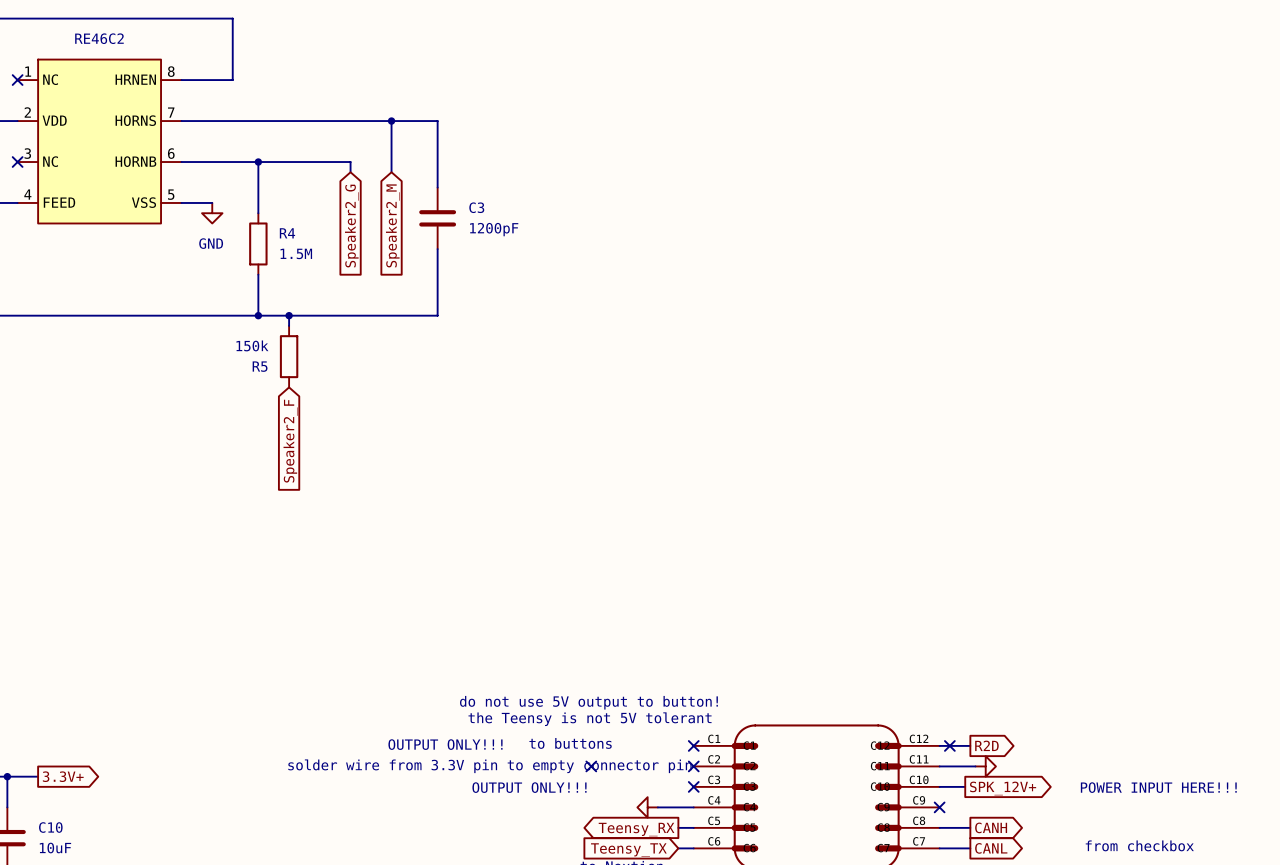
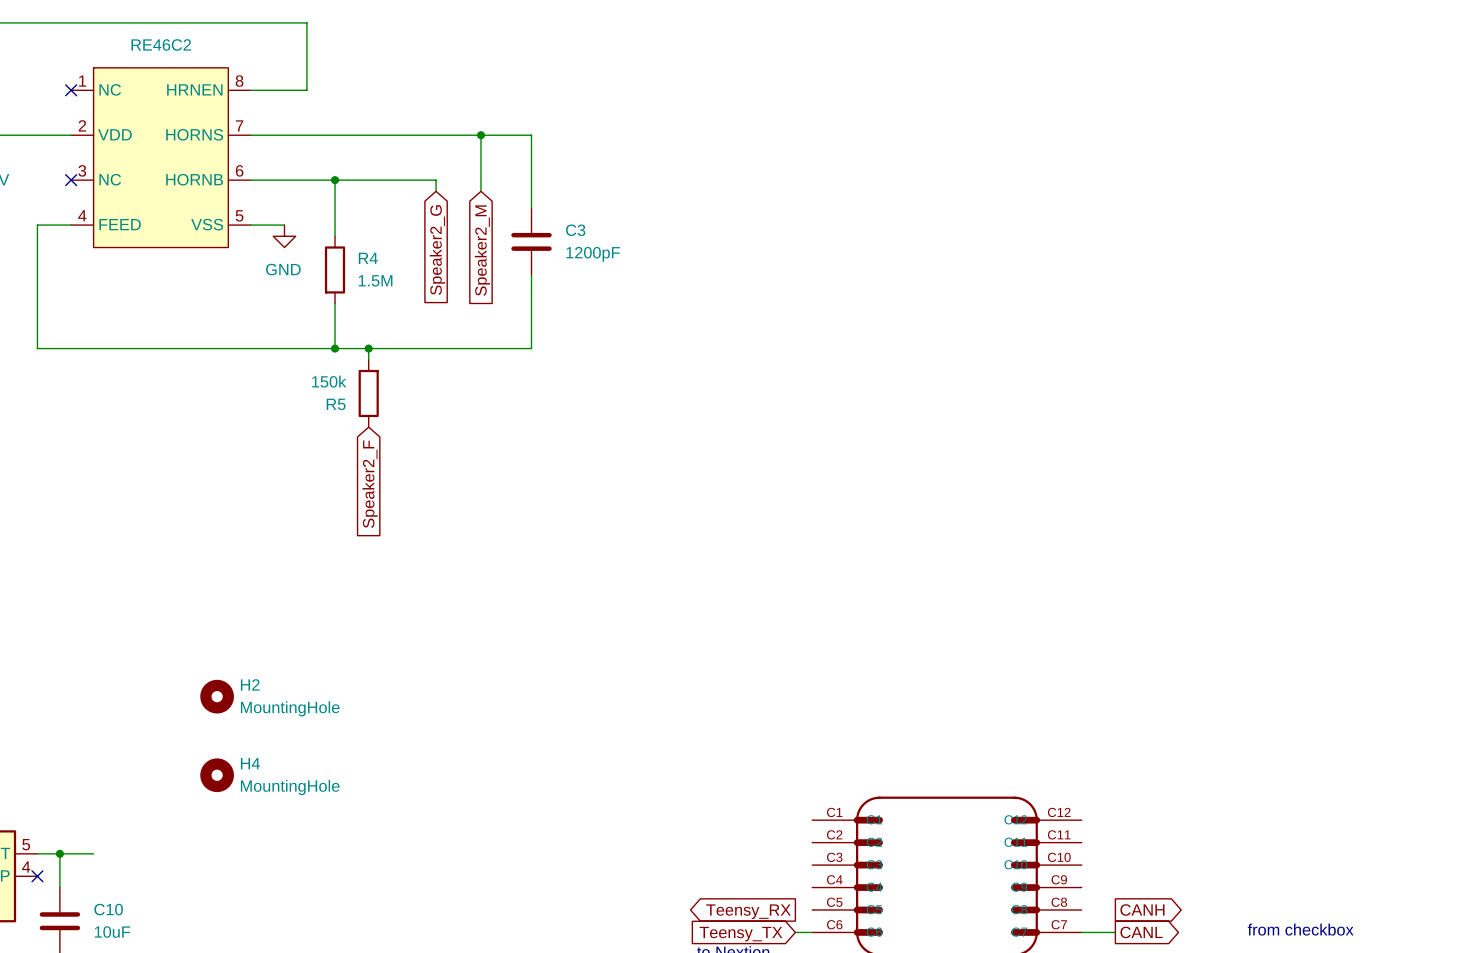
H2: none -> MountingHole (217, 696)
text: do not use 5V output to button! (588, 702) -> none
H4: none -> MountingHole (217, 775)
text: the Teensy is not 5V tolerant (590, 719) -> none
text: to buttons (570, 743) -> none
text: OUTPUT ONLY!!! (445, 744) -> none
no-connect mark: (693, 745) -> none
wire: (939, 745) (970, 745) -> none
no-connect mark: (949, 745) -> none
global label: R2D (986, 745) -> none
text: solder wire from 3.3V pin to empty connector pin (489, 766) -> none
no-connect mark: (591, 766) -> none
no-connect mark: (693, 766) -> none
wire: (939, 766) (975, 766) -> none
power symbol: (985, 766) -> none
global label: 3.3V+ (63, 776) -> none
no-connect mark: (693, 786) -> none
wire: (939, 786) (965, 786) -> none
text: OUTPUT ONLY!!! (529, 787) -> none
text: POWER INPUT HERE!!! (1158, 787) -> none
global label: SPK_12V+ (1003, 788) -> none
power symbol: (647, 807) -> none
wire: (657, 807) (693, 807) -> none
no-connect mark: (939, 807) -> none
wire: (678, 827) (693, 827) -> none
wire: (939, 827) (970, 827) -> none

